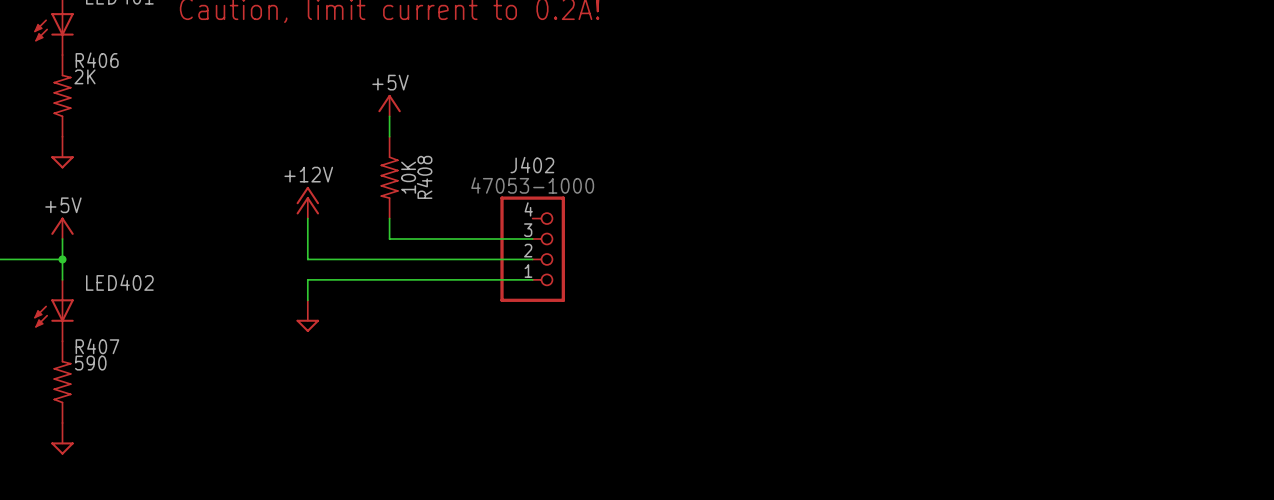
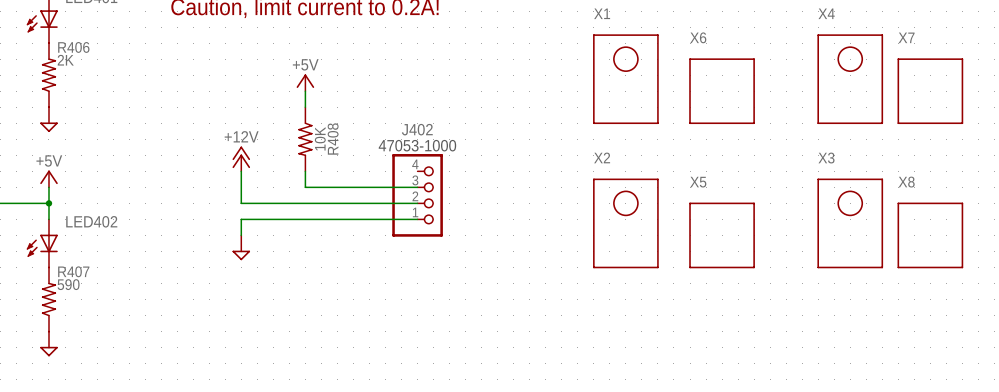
X1: none -> (625, 79)
X4: none -> (850, 79)
X6: none -> (722, 91)
X7: none -> (930, 91)
X2: none -> (625, 223)
X3: none -> (850, 223)
X5: none -> (722, 235)
X8: none -> (930, 235)

